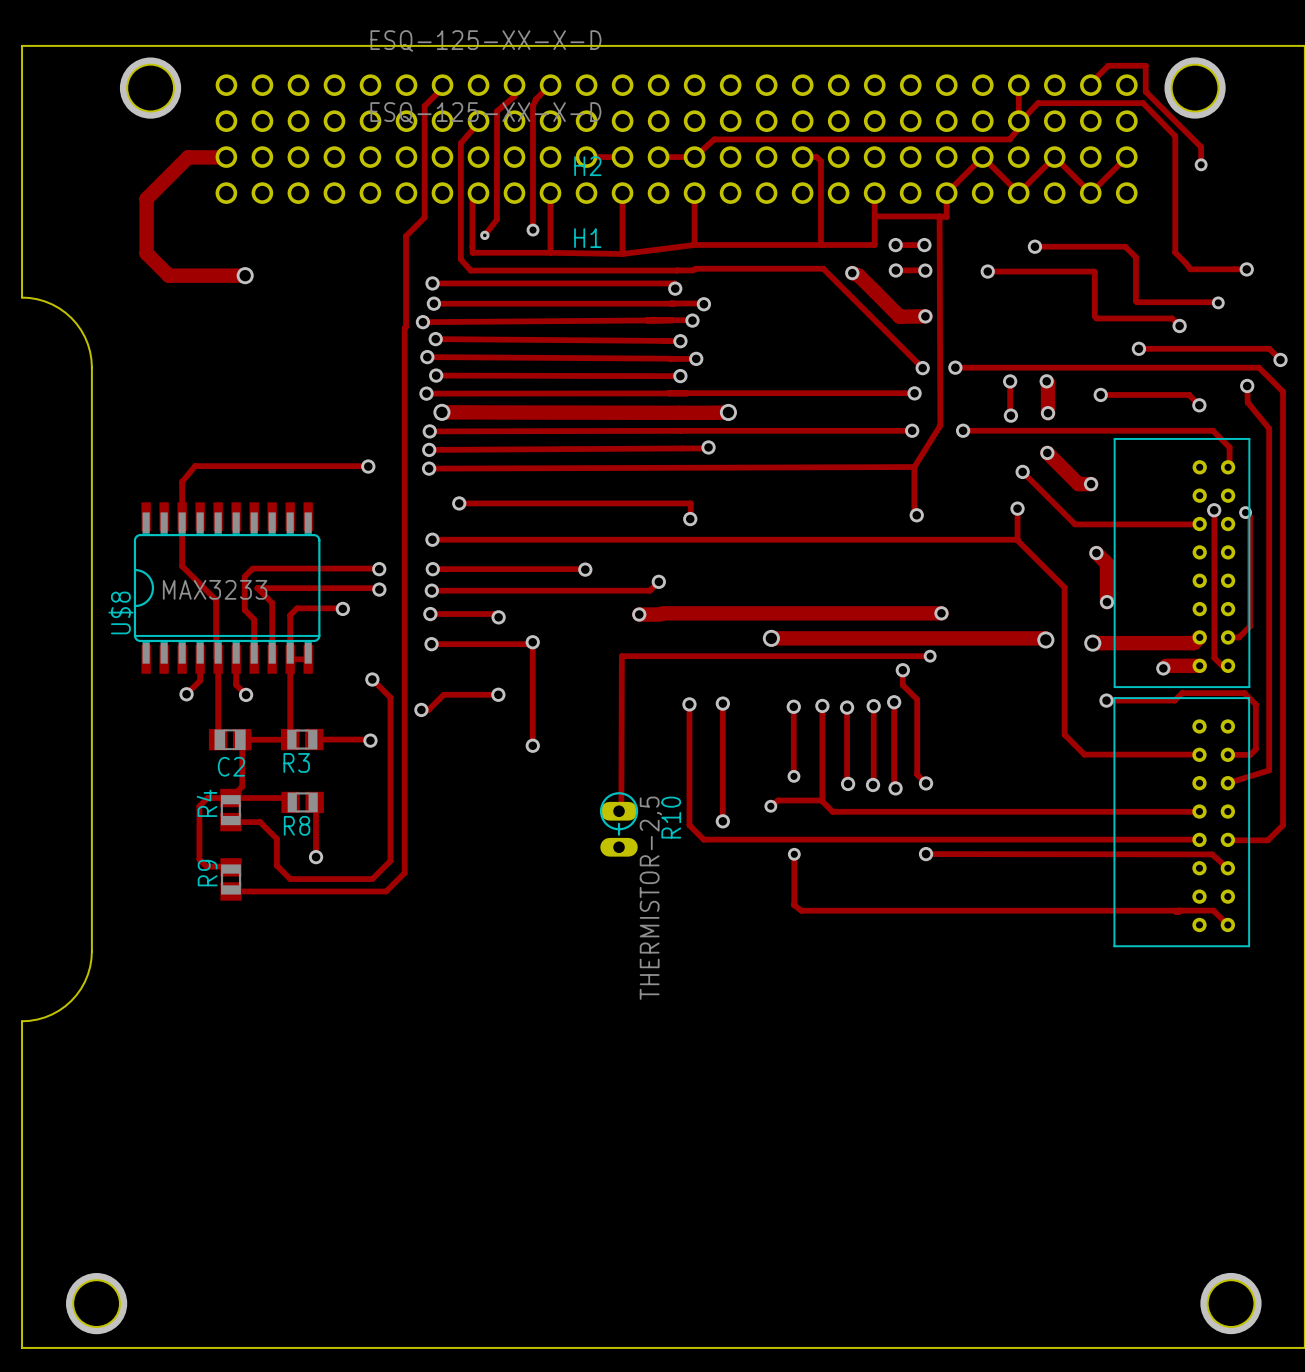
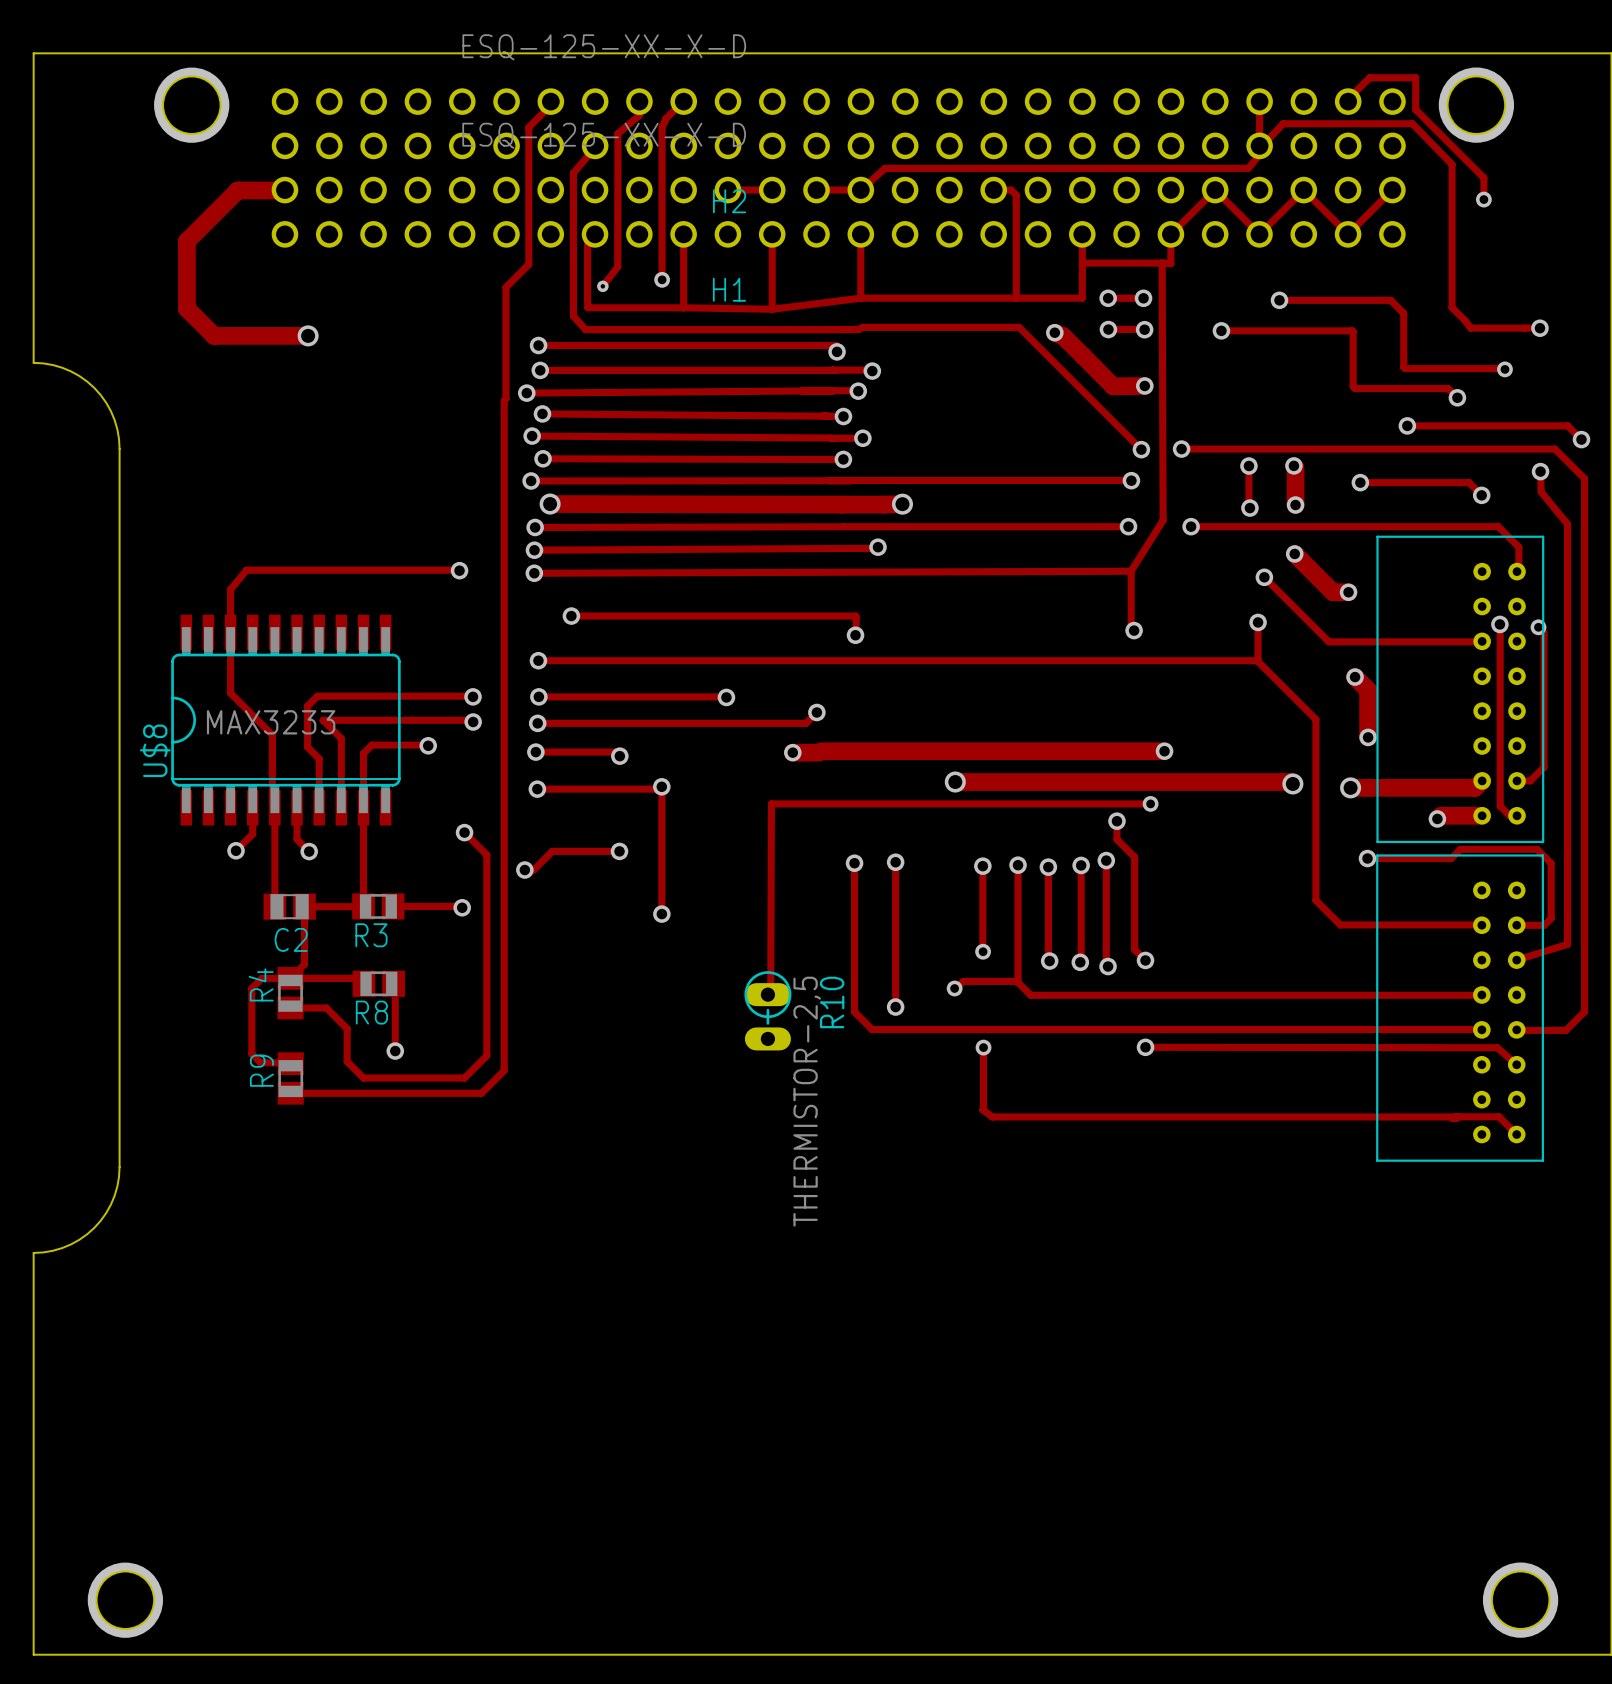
track: (290, 659) (308, 659) -> none

